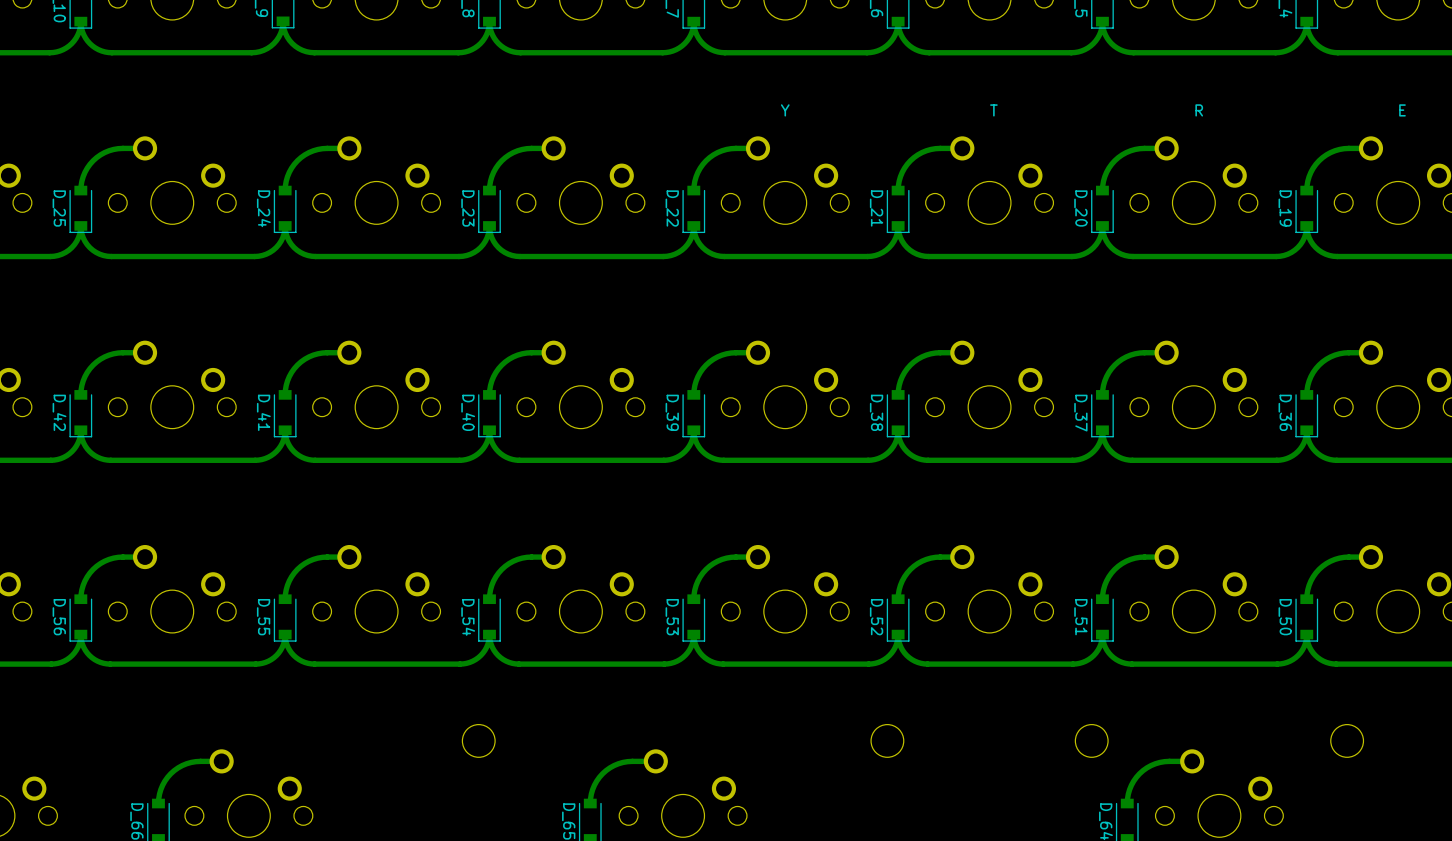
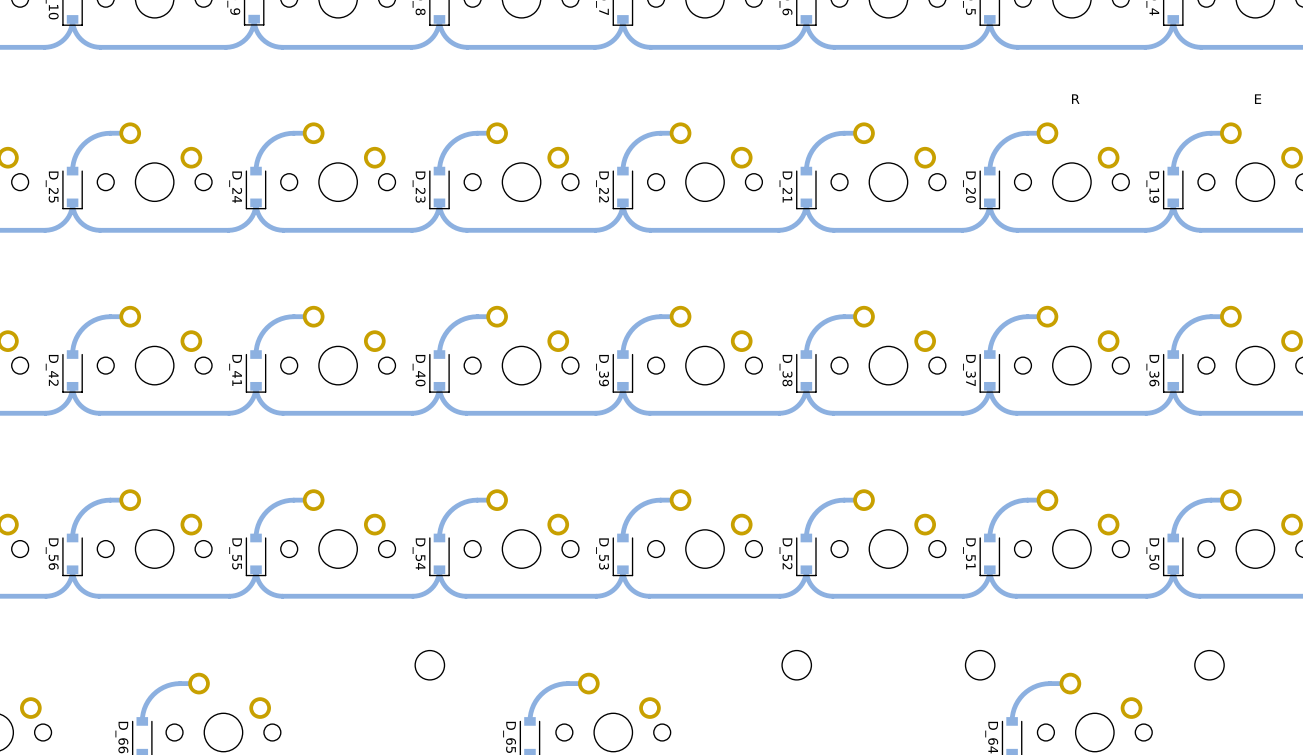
text: Y (785, 110) -> none
text: T (993, 110) -> none

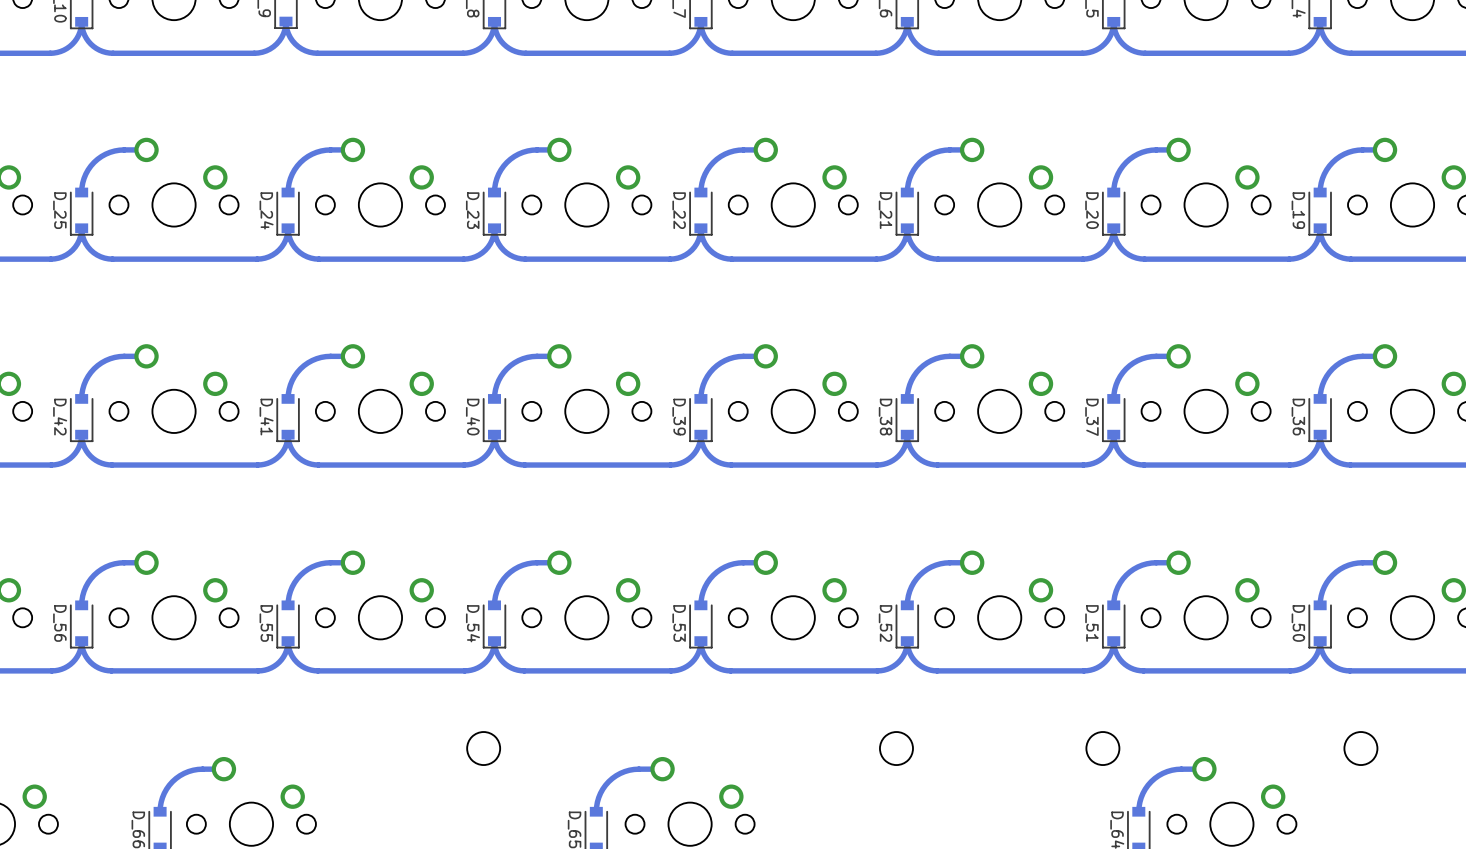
text: R (1075, 99) -> none
text: E (1258, 99) -> none

